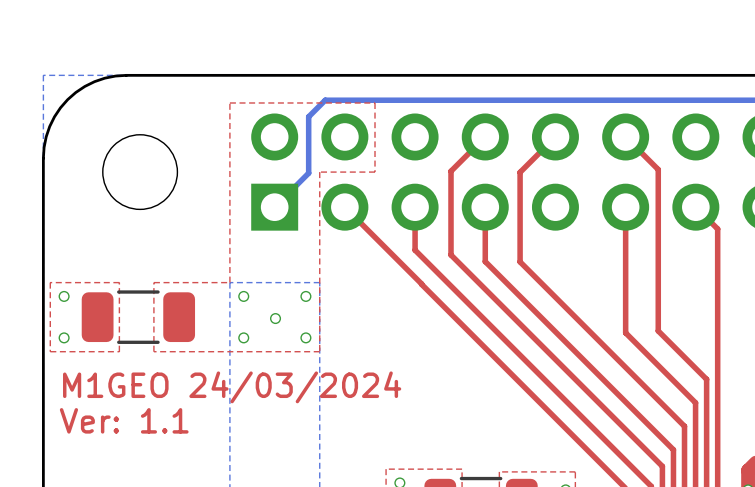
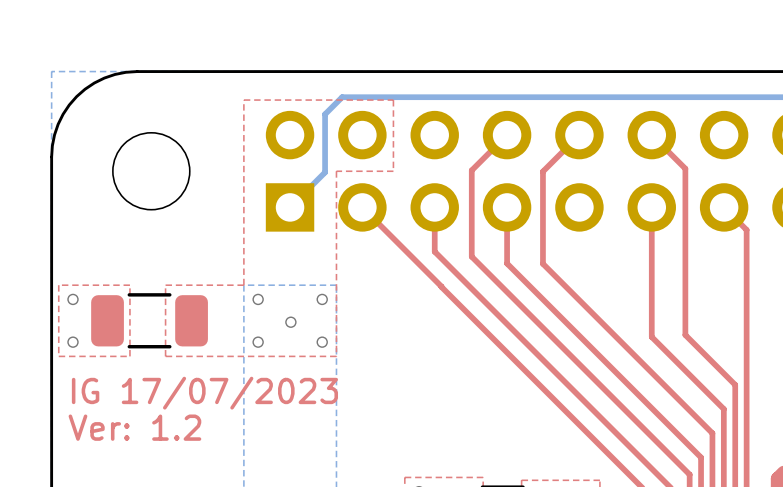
text: M1GEO 24/03/2024 (232, 387) -> IG 17/07/2023 (204, 393)
text: Ver: 1.1 (124, 420) -> Ver: 1.2 (134, 427)

